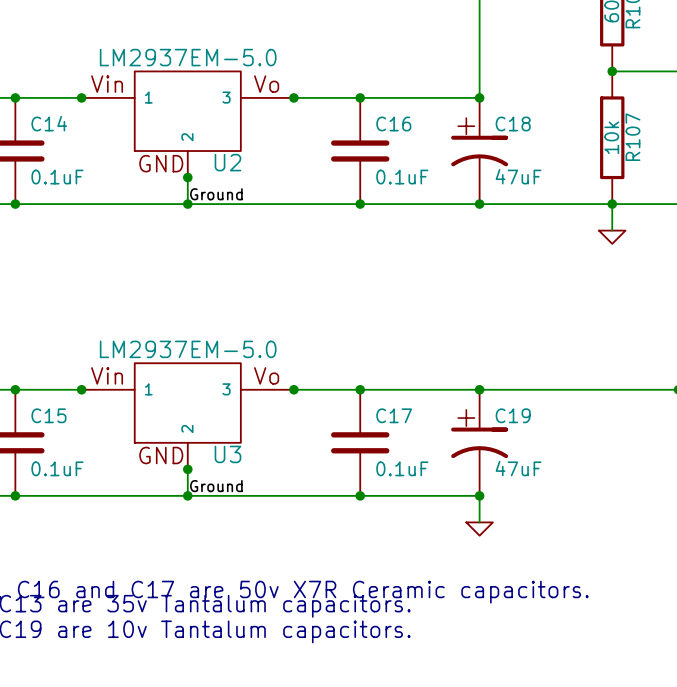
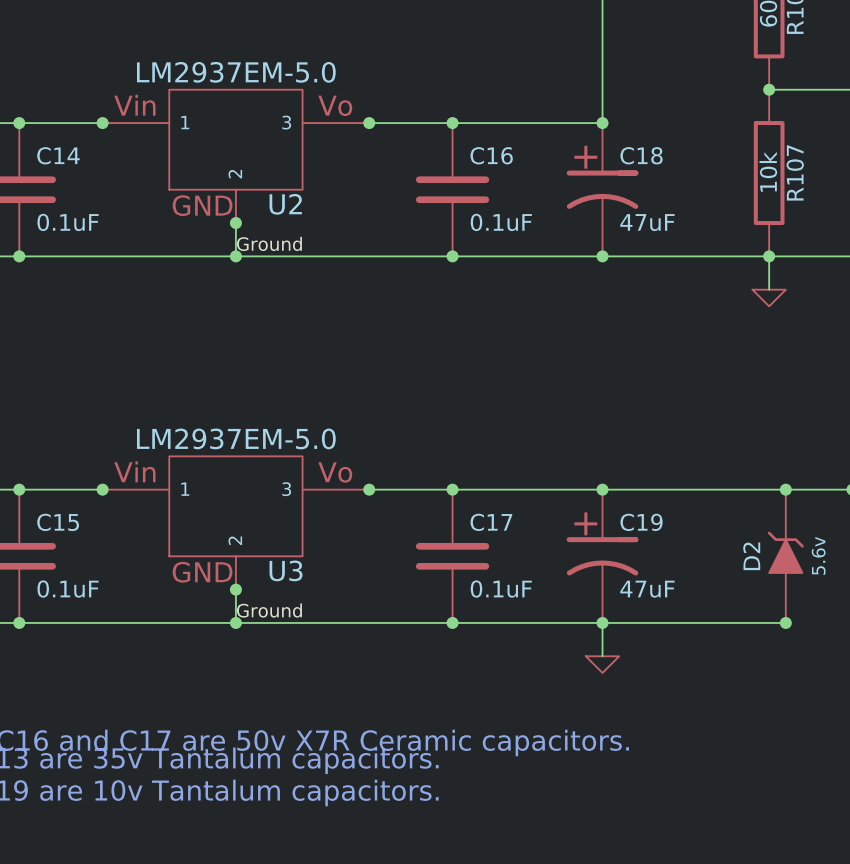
junction: none -> (785, 489)
D2: none -> 5.6v (785, 556)
wire: none -> (602, 622) (785, 622)
junction: none -> (785, 622)

